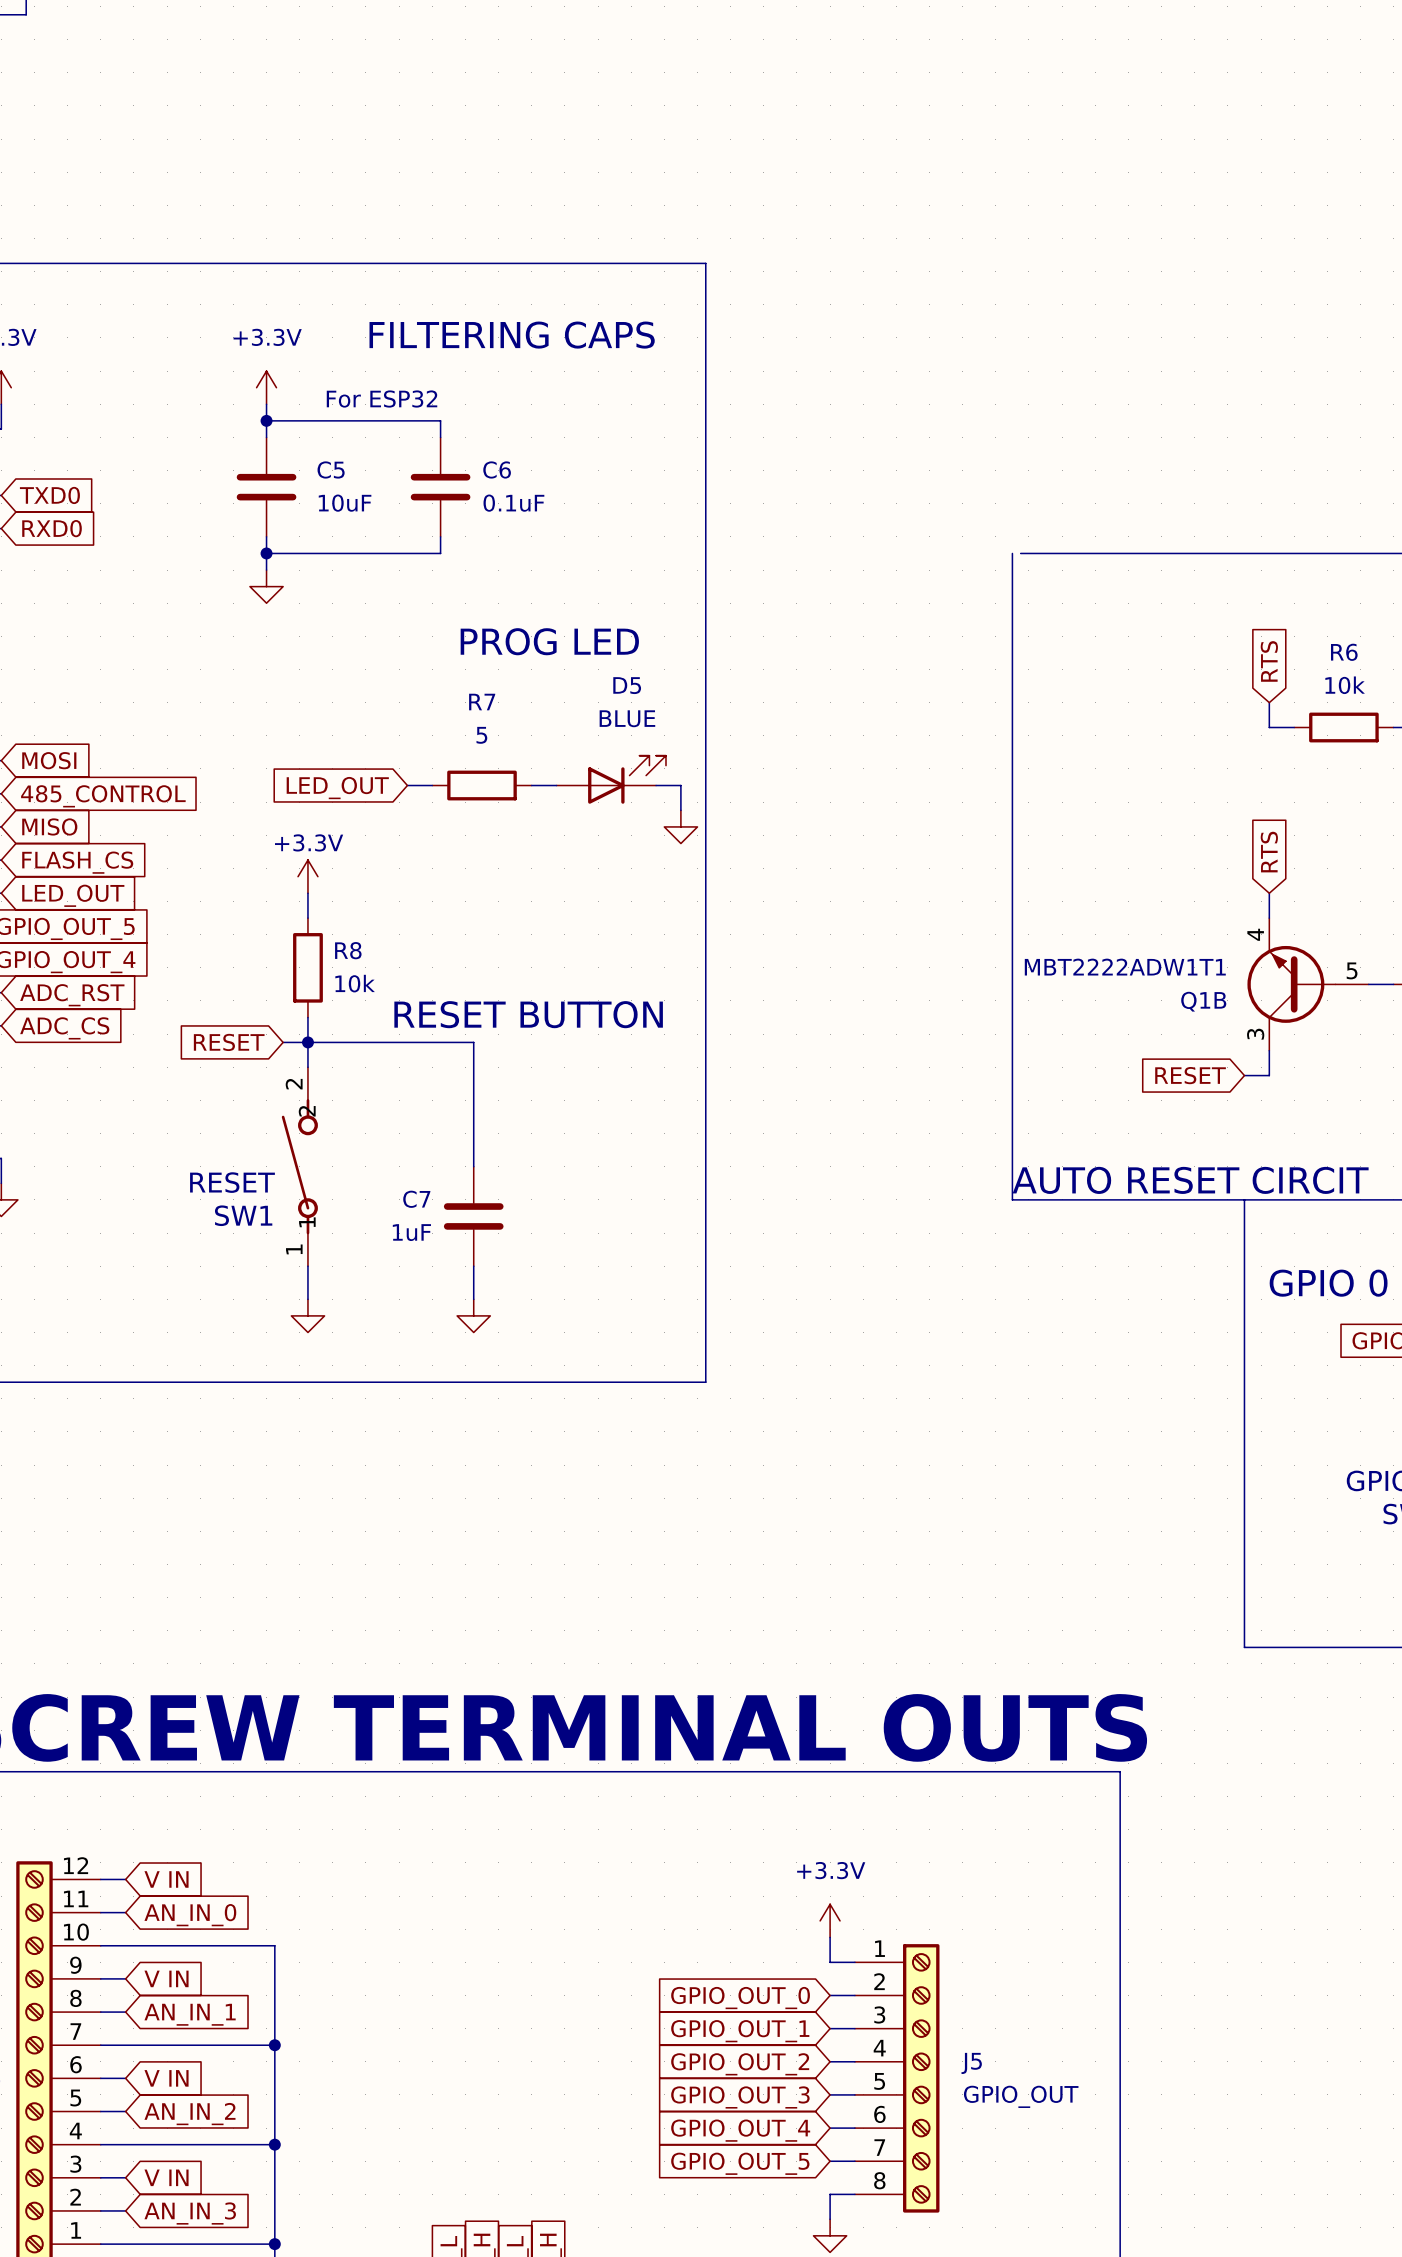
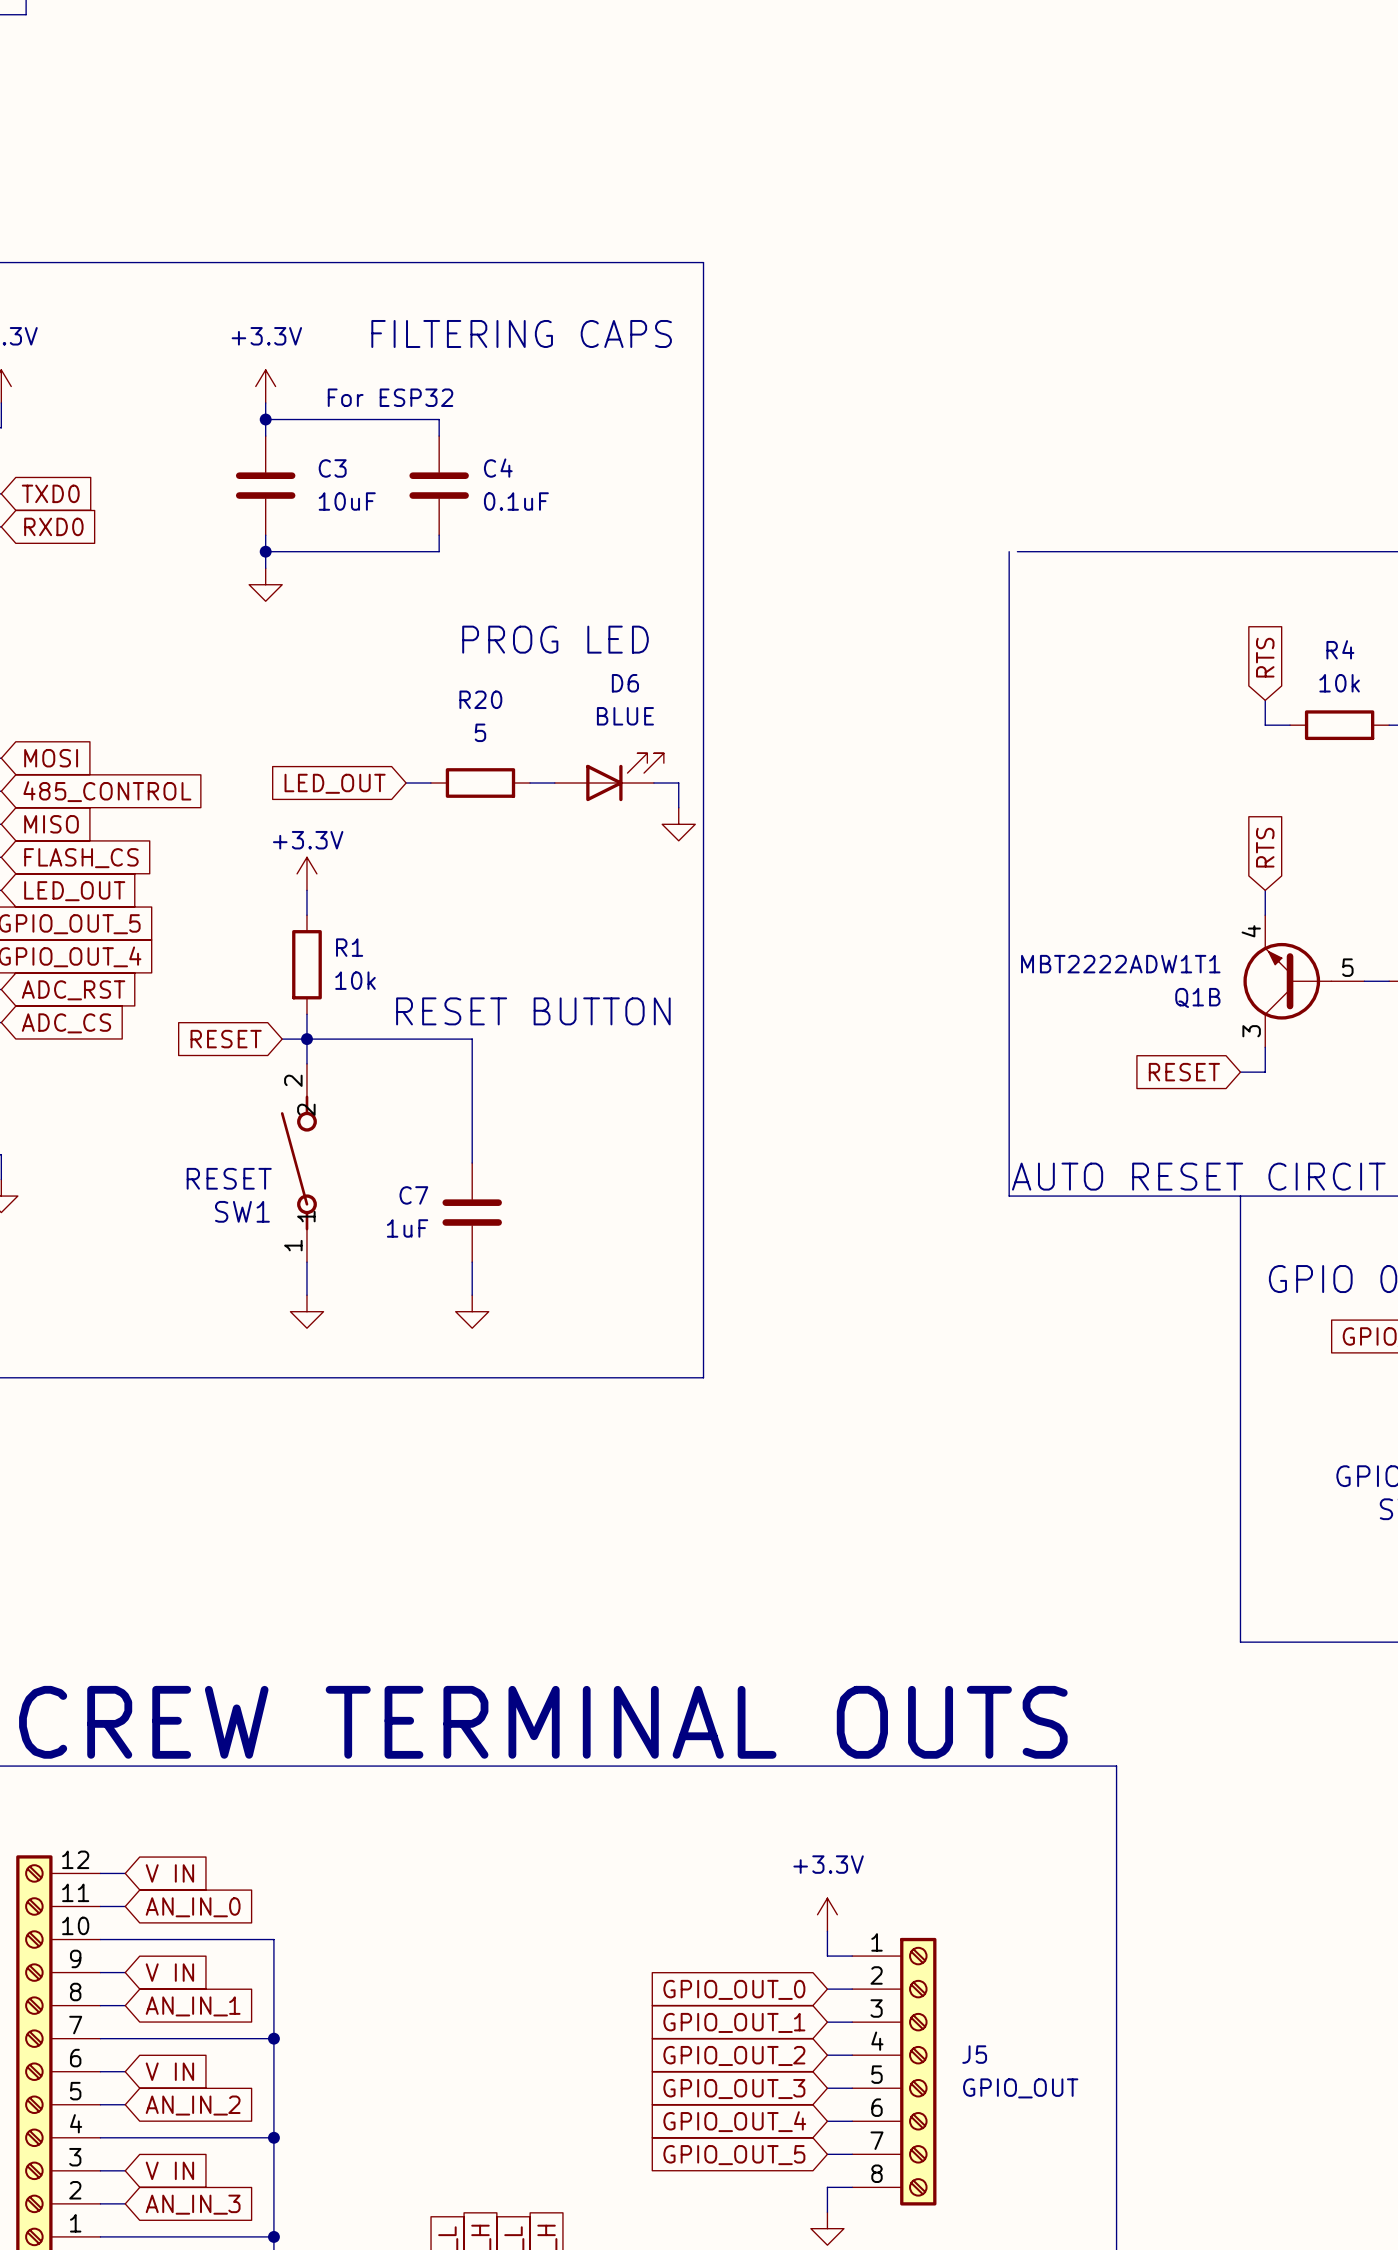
C5 name: C5 (331, 469) -> C3 (332, 468)
C6 name: C6 (497, 469) -> C4 (498, 468)
R6 name: R6 (1344, 652) -> R4 (1340, 649)
D5 name: D5 (627, 685) -> D6 (625, 683)
R7 name: R7 (482, 702) -> R20 (480, 699)
R8 name: R8 (348, 950) -> R1 (349, 947)

